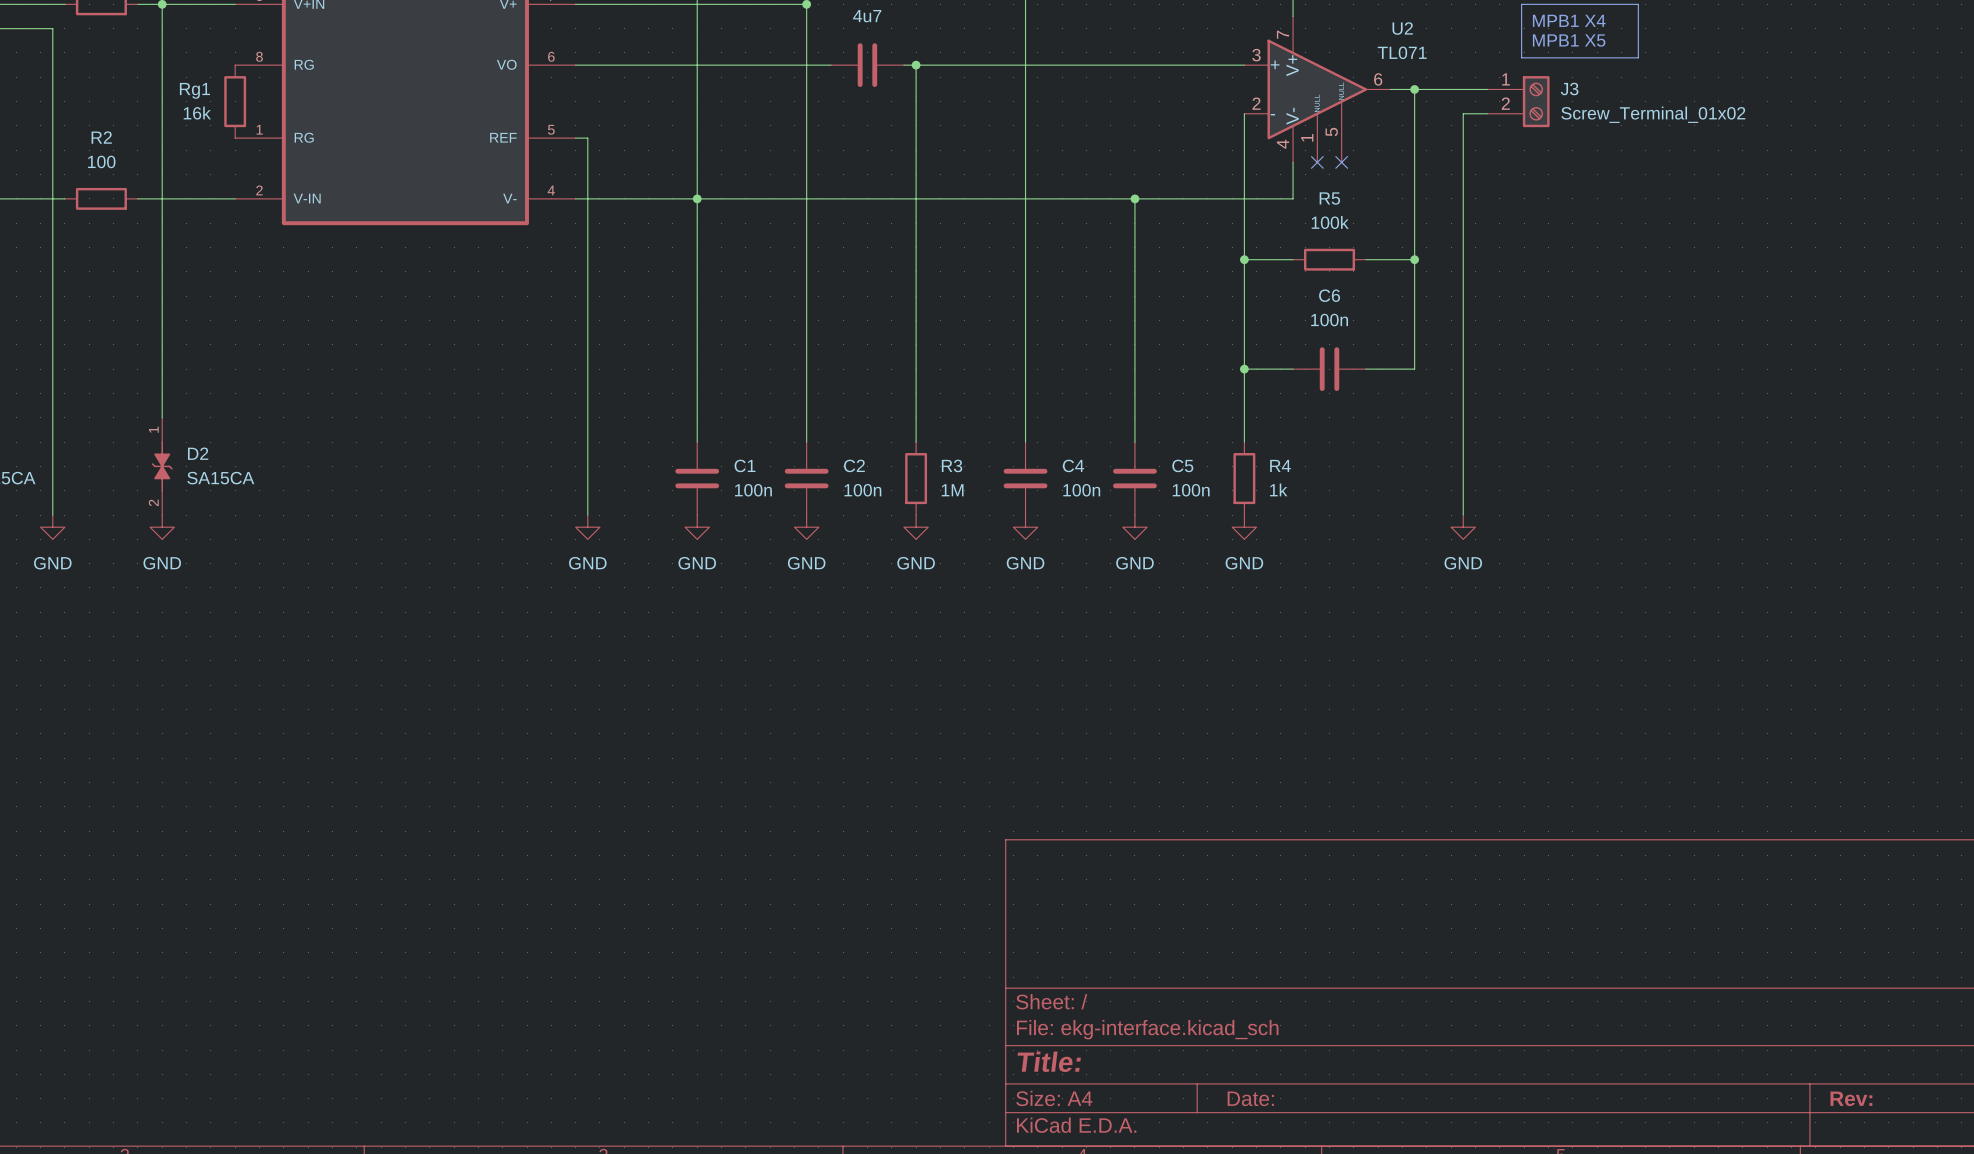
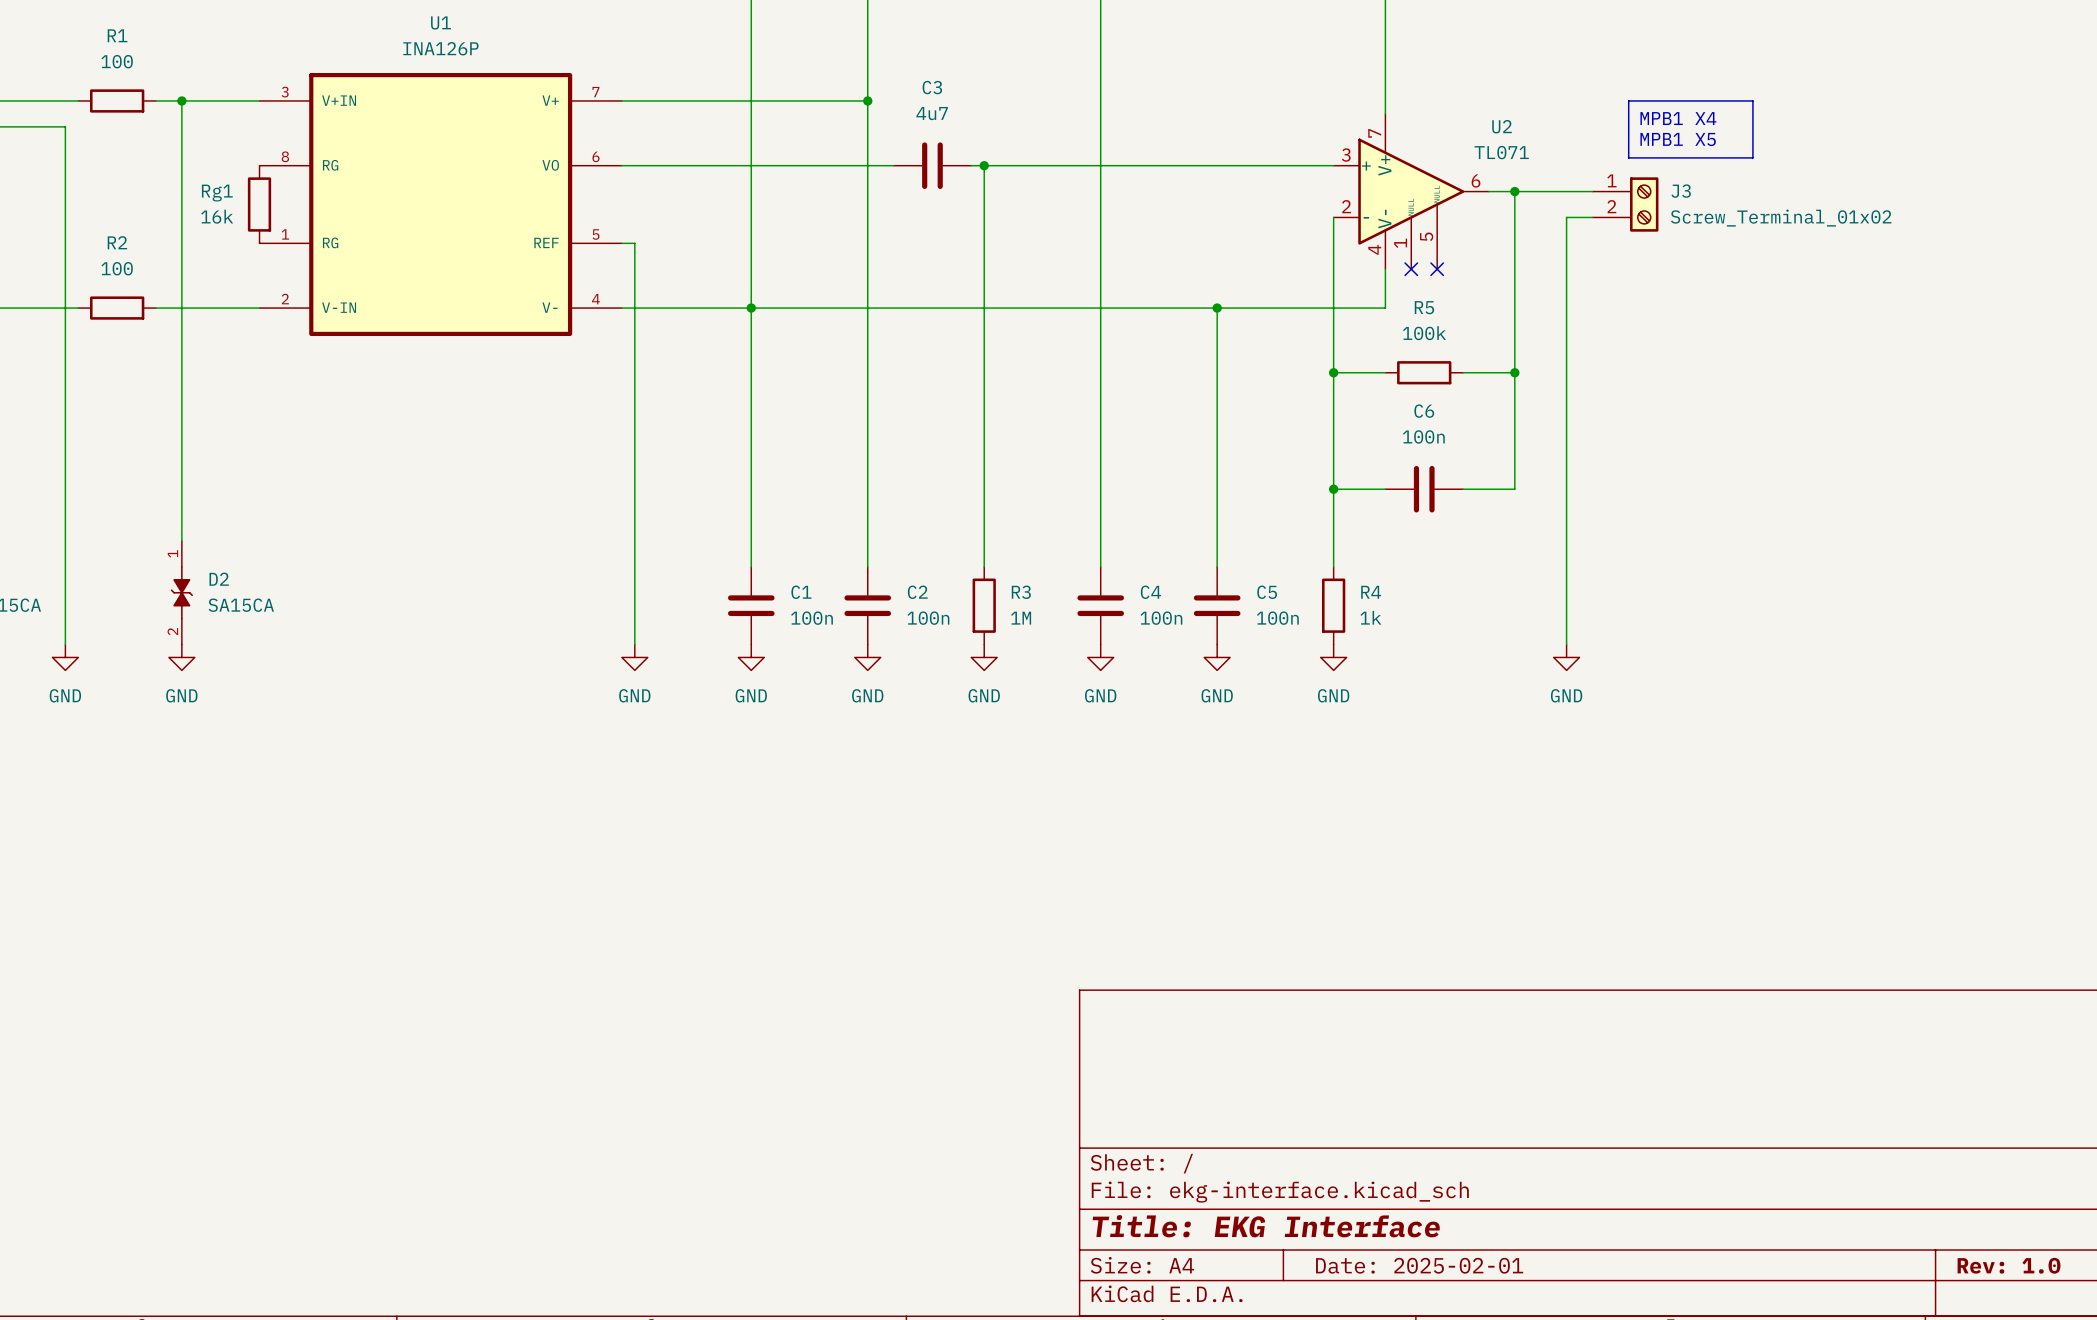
title block: Title: (1049, 1061) -> Title: EKG Interface (1266, 1226)
title block: Date: (1250, 1098) -> Date: 2025-02-01 (1419, 1265)
title block: Rev: (1851, 1098) -> Rev: 1.0 (2009, 1265)

